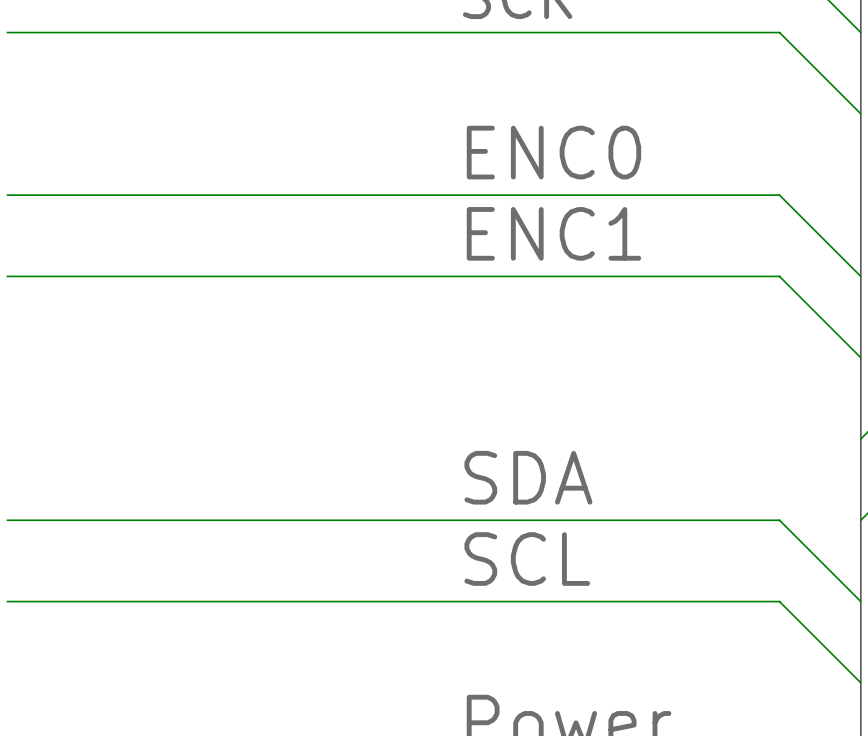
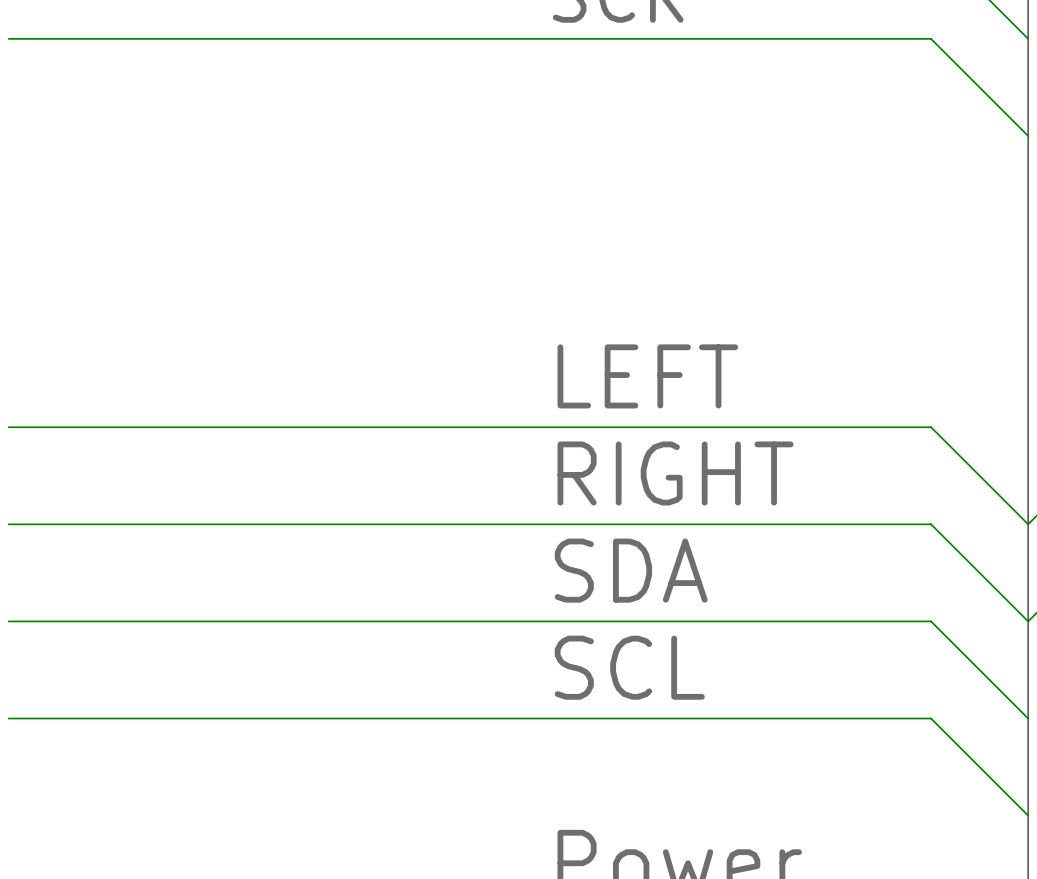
label: ENC0 (553, 152) -> none
wire: (7, 195) (779, 195) (860, 276) -> (8, 427) (931, 427) (1028, 524)
label: ENC1 (553, 233) -> none
wire: (7, 276) (779, 276) (860, 357) -> (8, 524) (931, 524) (1028, 621)
label: none -> LEFT (647, 376)
label: none -> RIGHT (675, 473)

